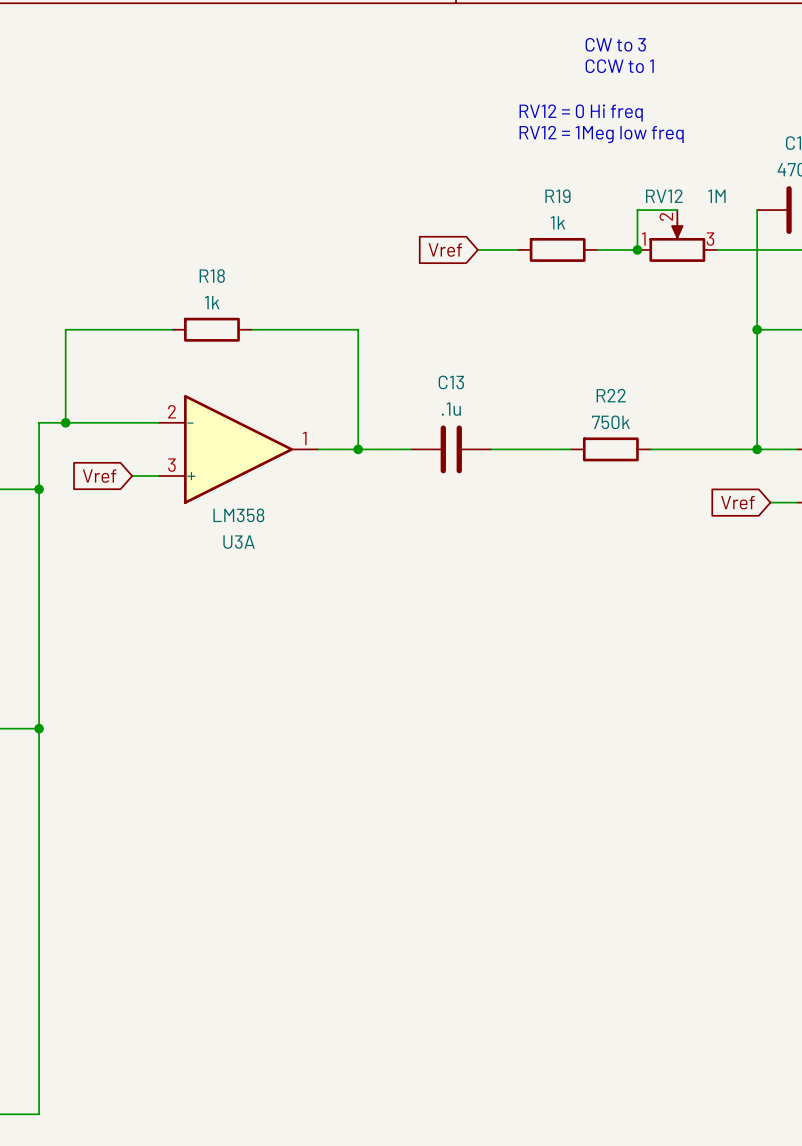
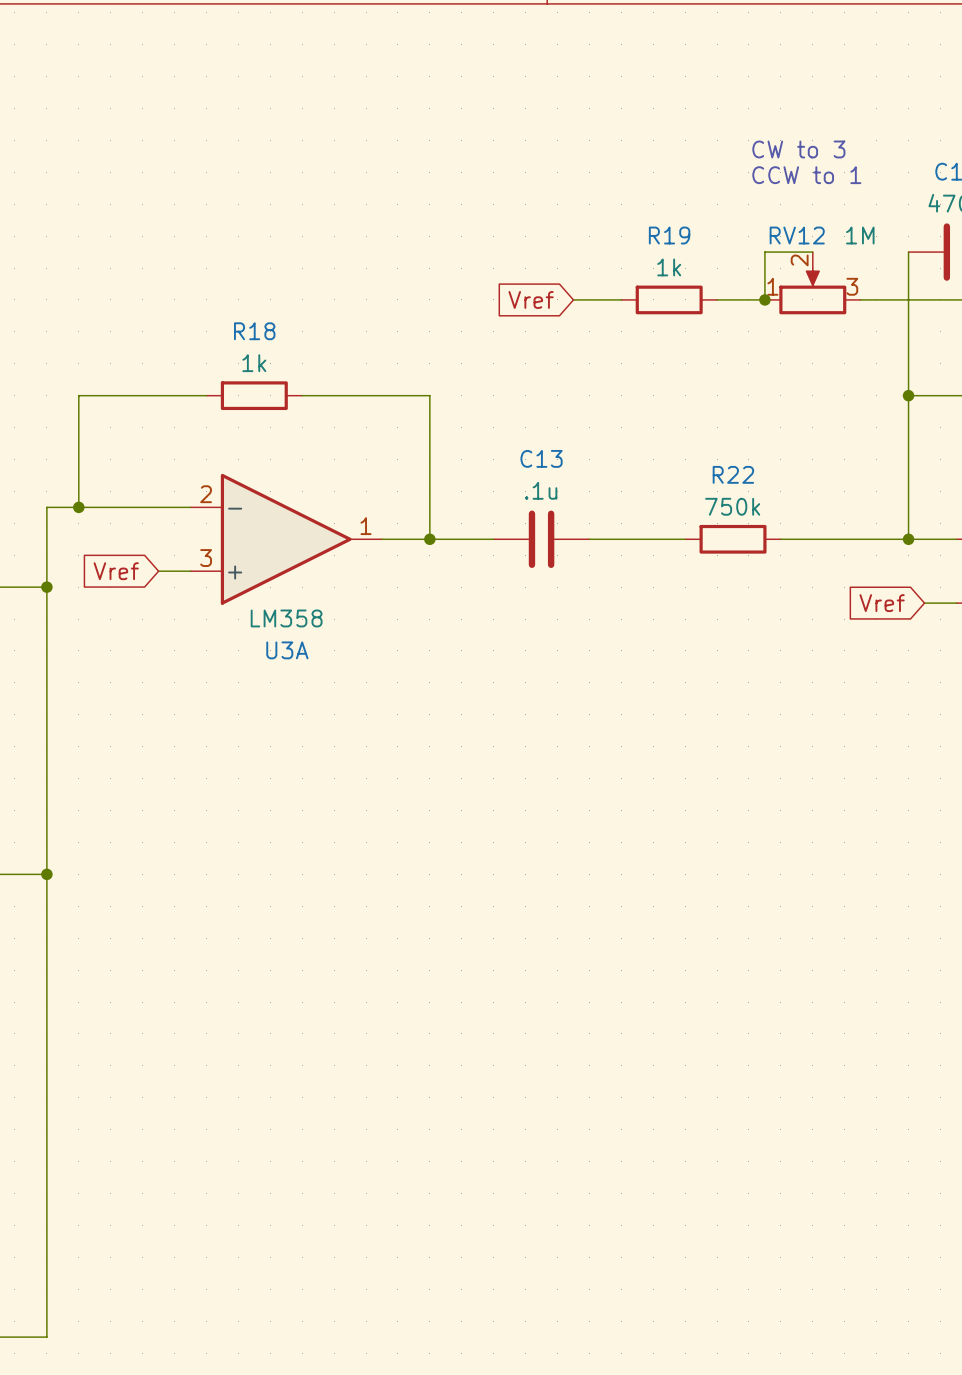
text position: CW to 3 (615, 44) -> CW to 3 (798, 149)
text position: CCW to 1 (619, 66) -> CCW to 1 (806, 175)
text: RV12 = 0 Hi freq (581, 113) -> none
text: RV12 = 1Meg low freq (601, 134) -> none

